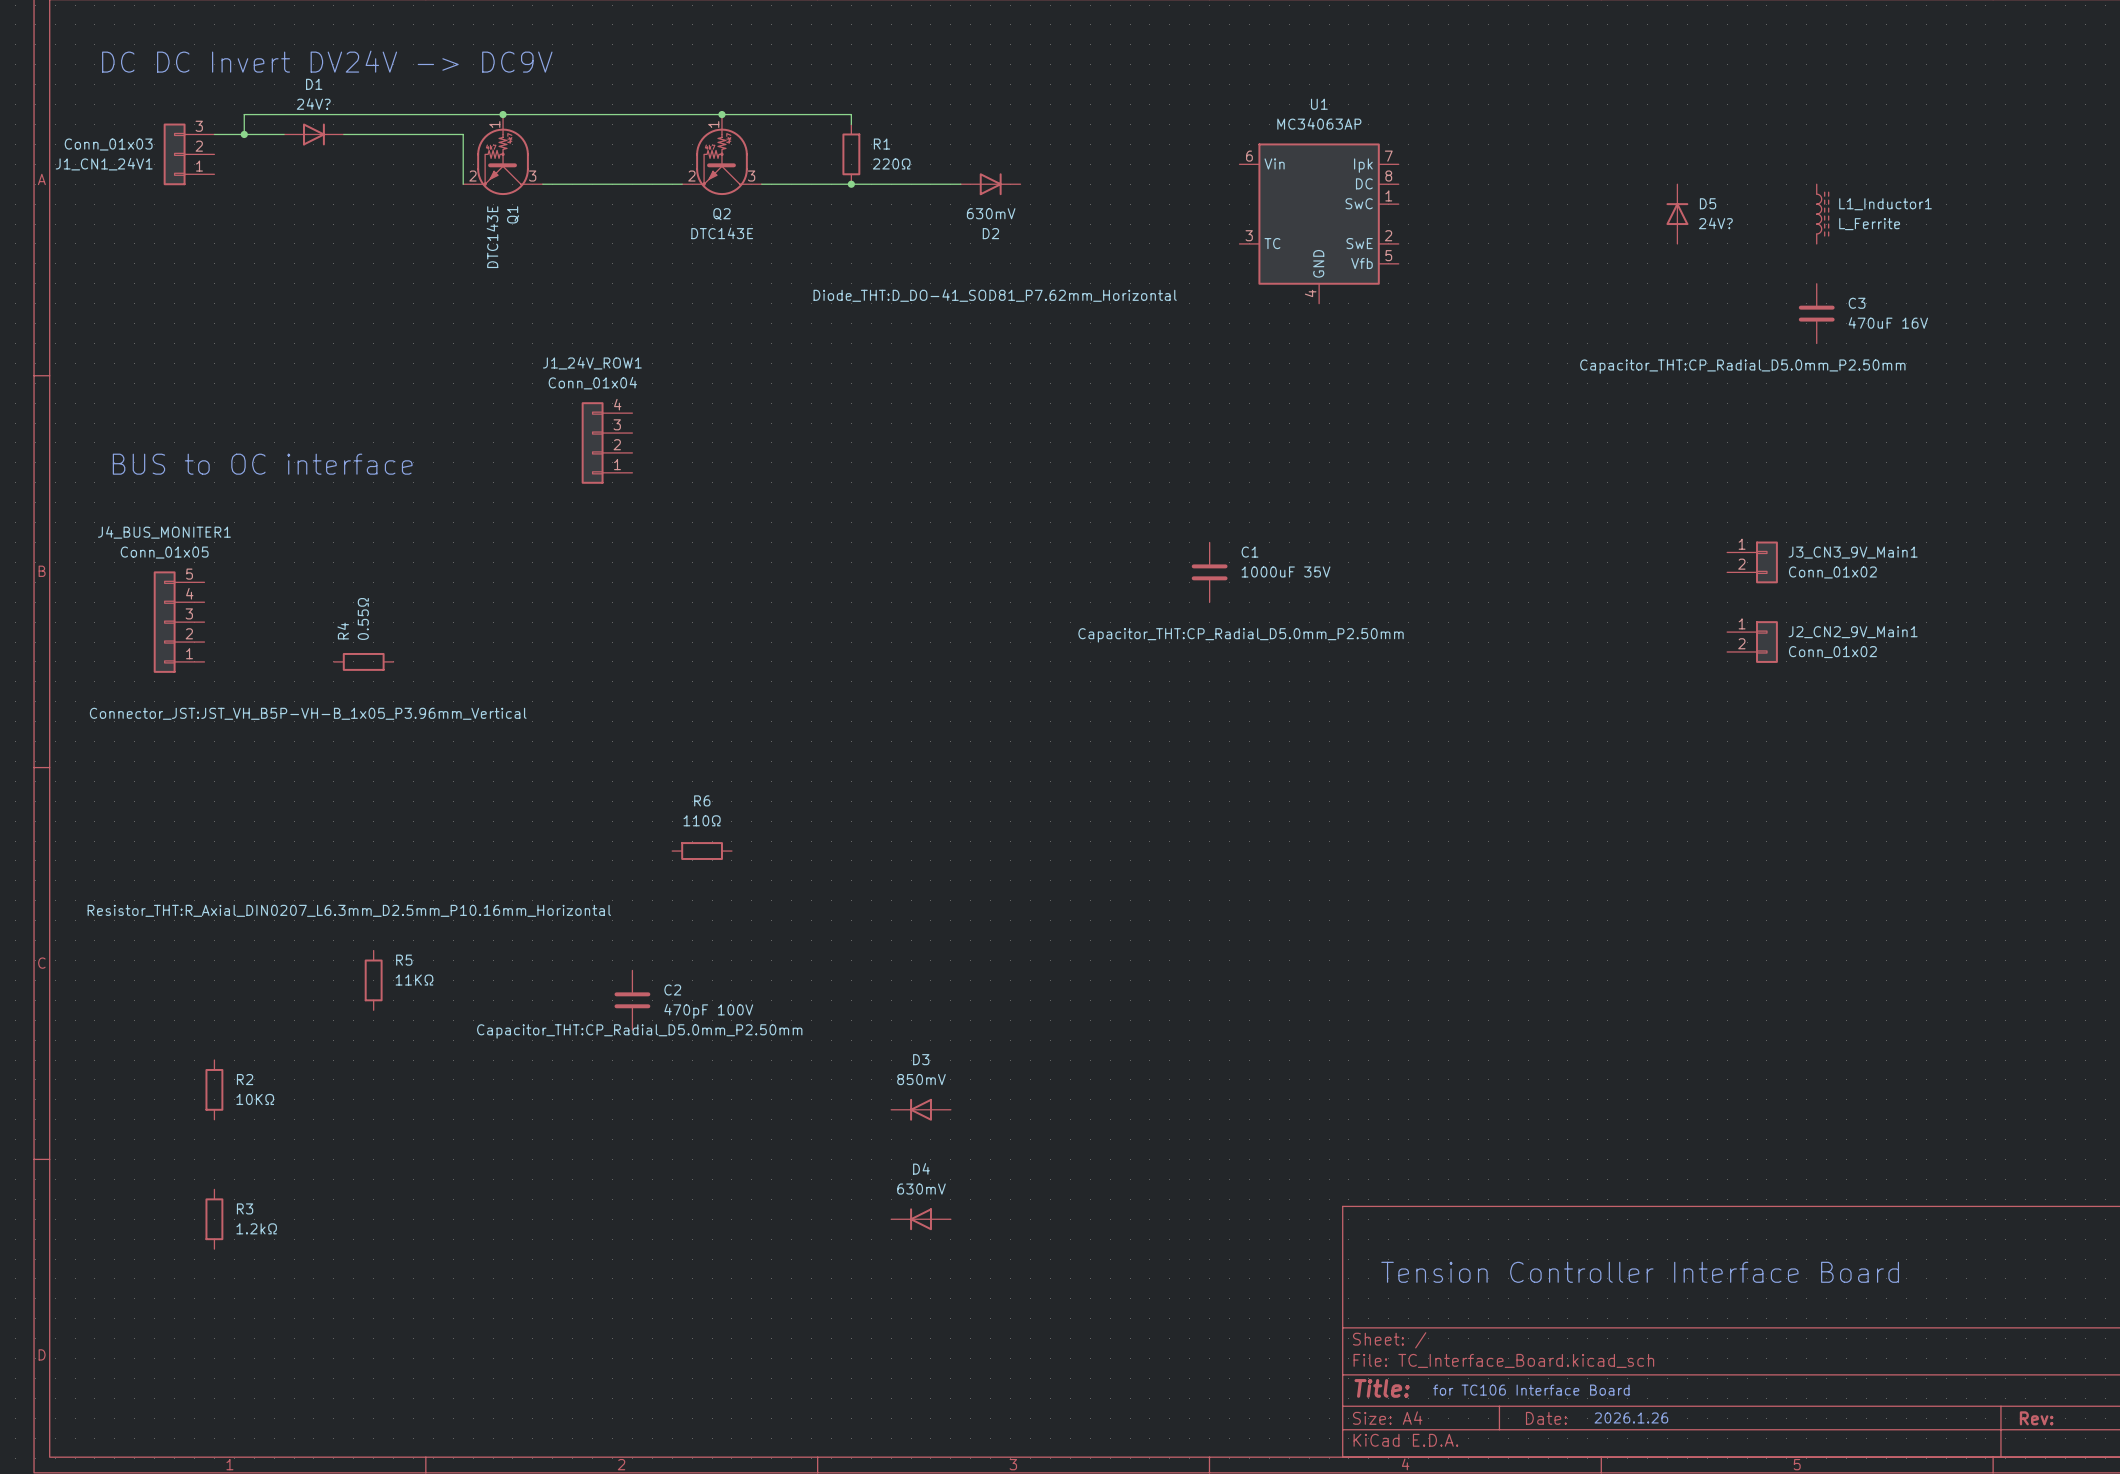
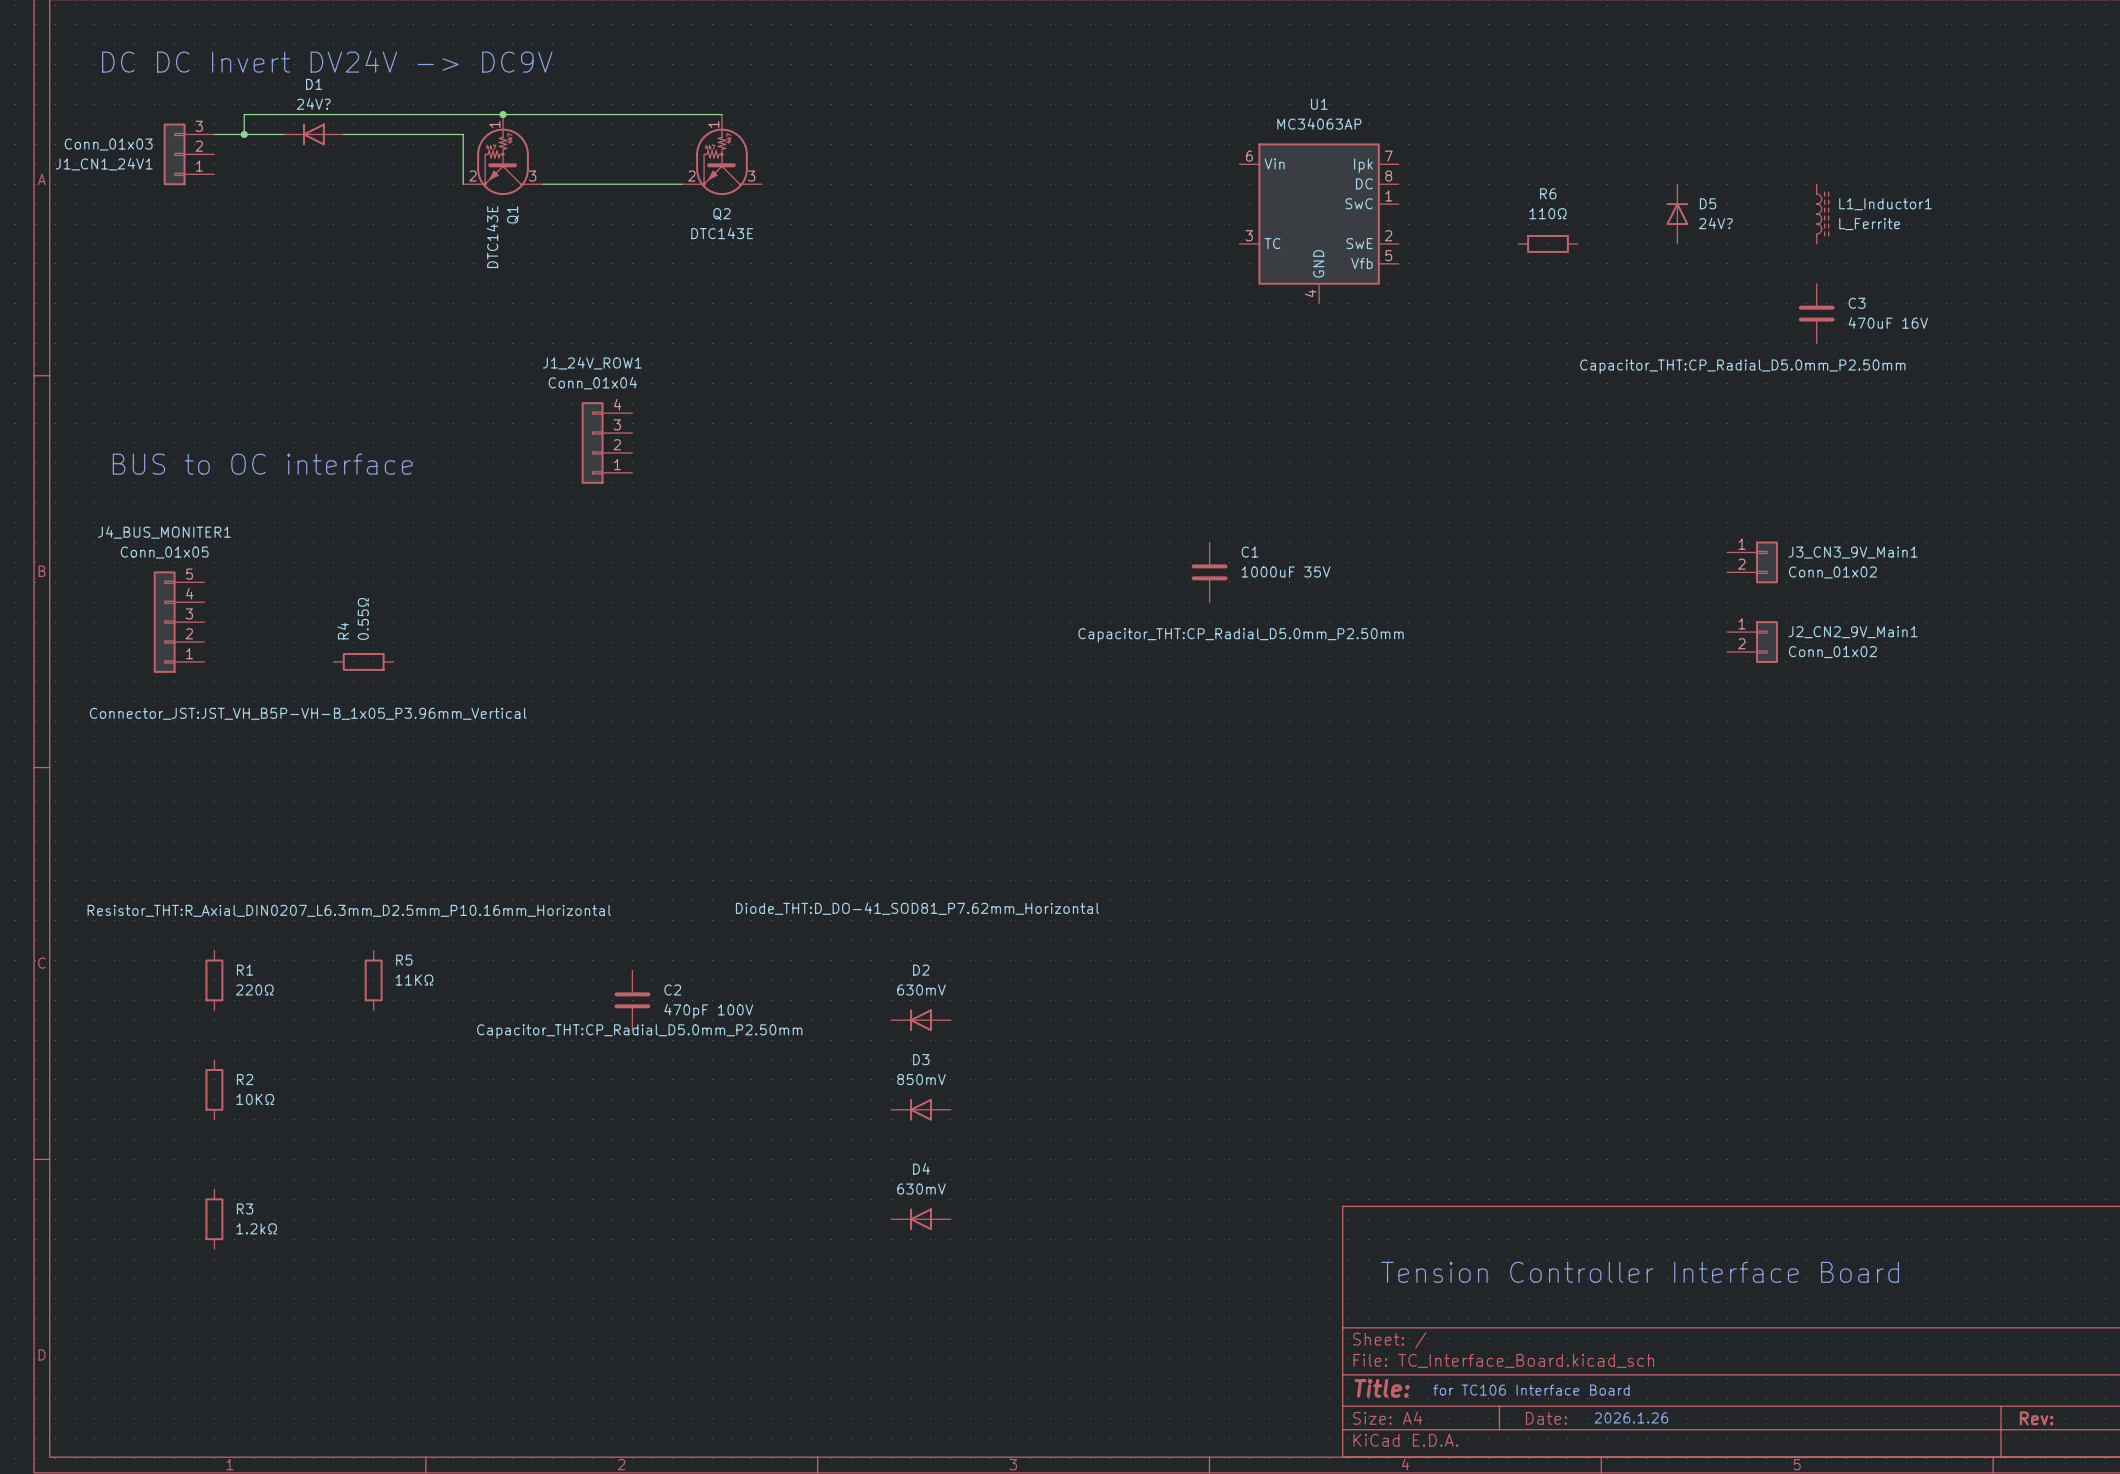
wire: (721, 114) (851, 114) (851, 124) -> none
junction: (721, 114) -> none
D1 rotation: 0° (313, 134) -> 180° (313, 134)
R1 position: (851, 154) -> (214, 980)
wire: (761, 184) (960, 184) -> none
junction: (851, 184) -> none
D2 rotation: 0° (990, 184) -> 180° (921, 1020)
D2 position: (990, 184) -> (921, 1020)
R6 position: (702, 851) -> (1548, 243)

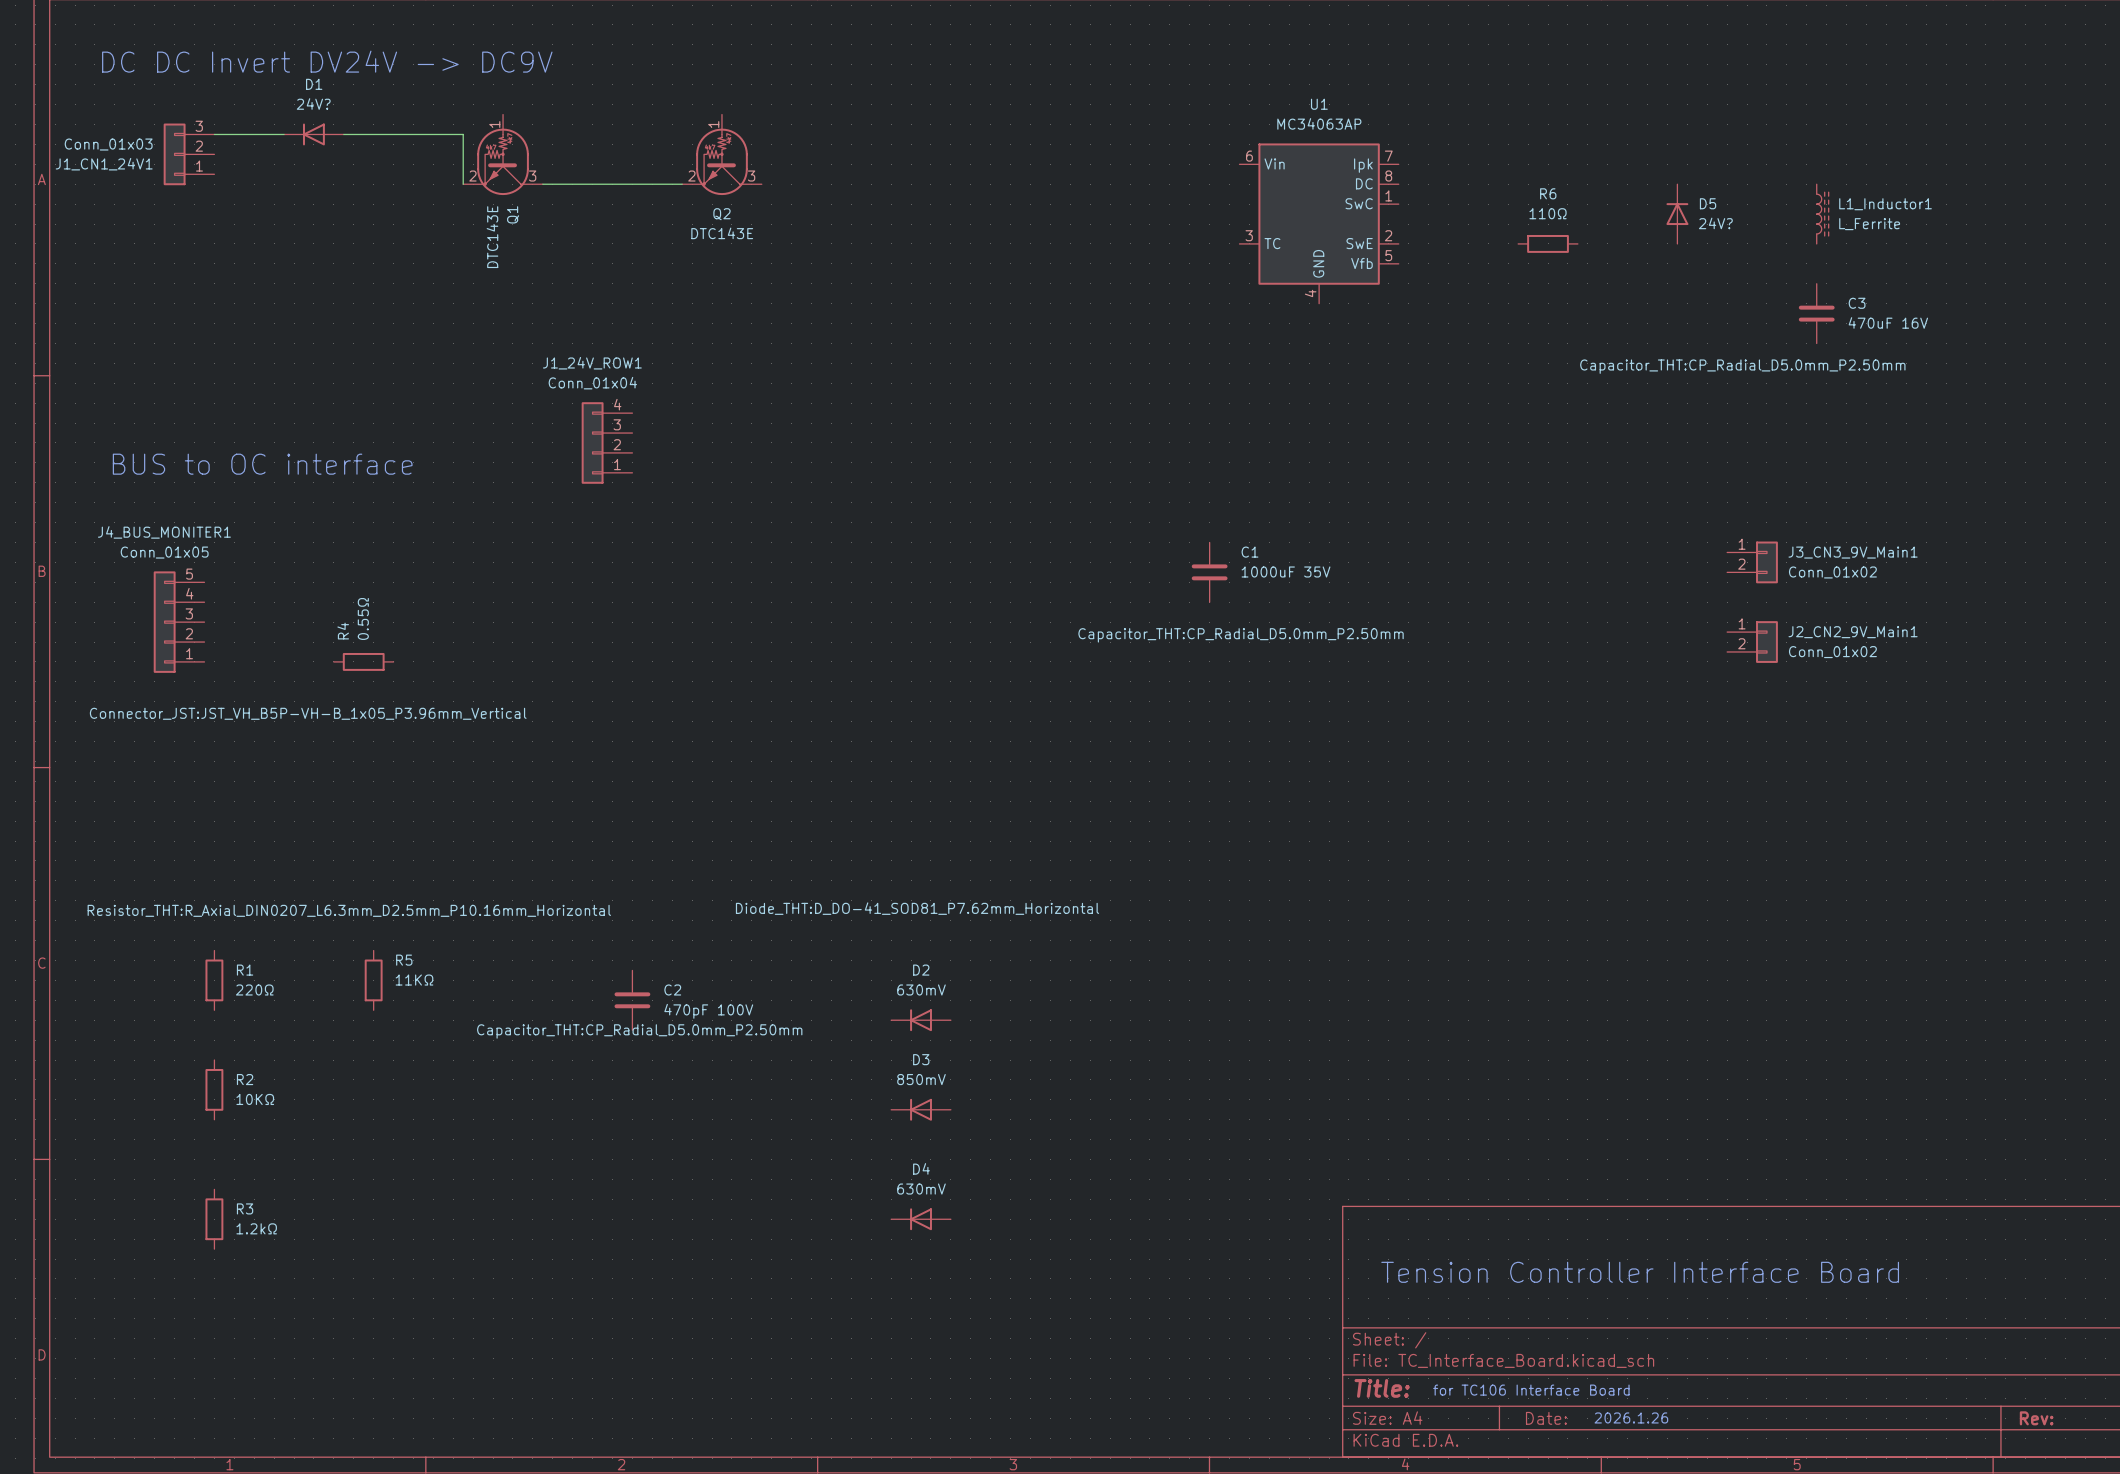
junction: (503, 114) -> none
wire: (721, 114) (244, 114) (244, 134) -> none
junction: (244, 134) -> none

